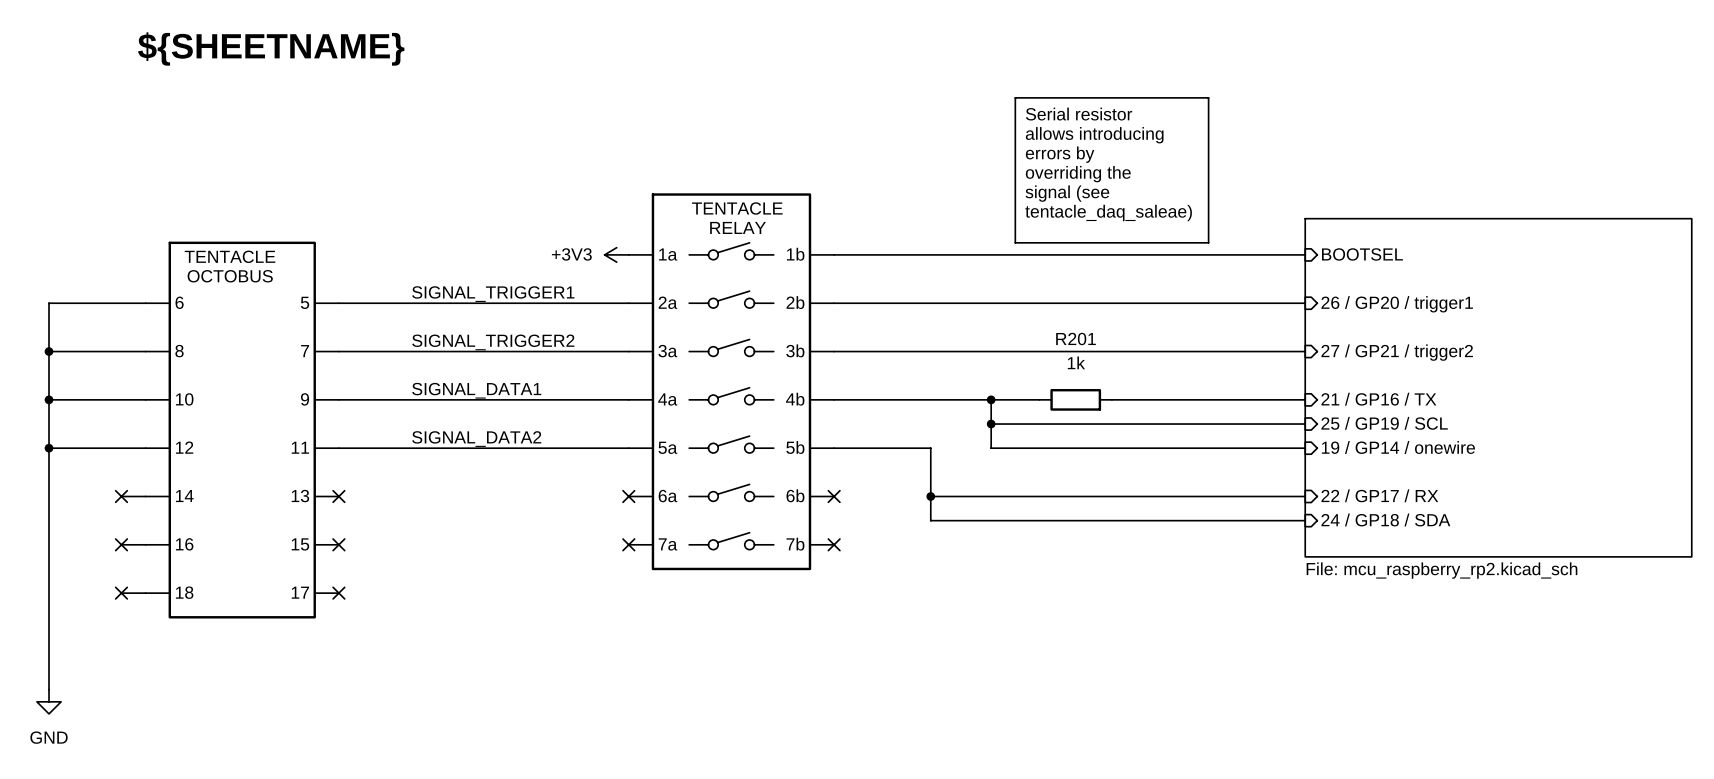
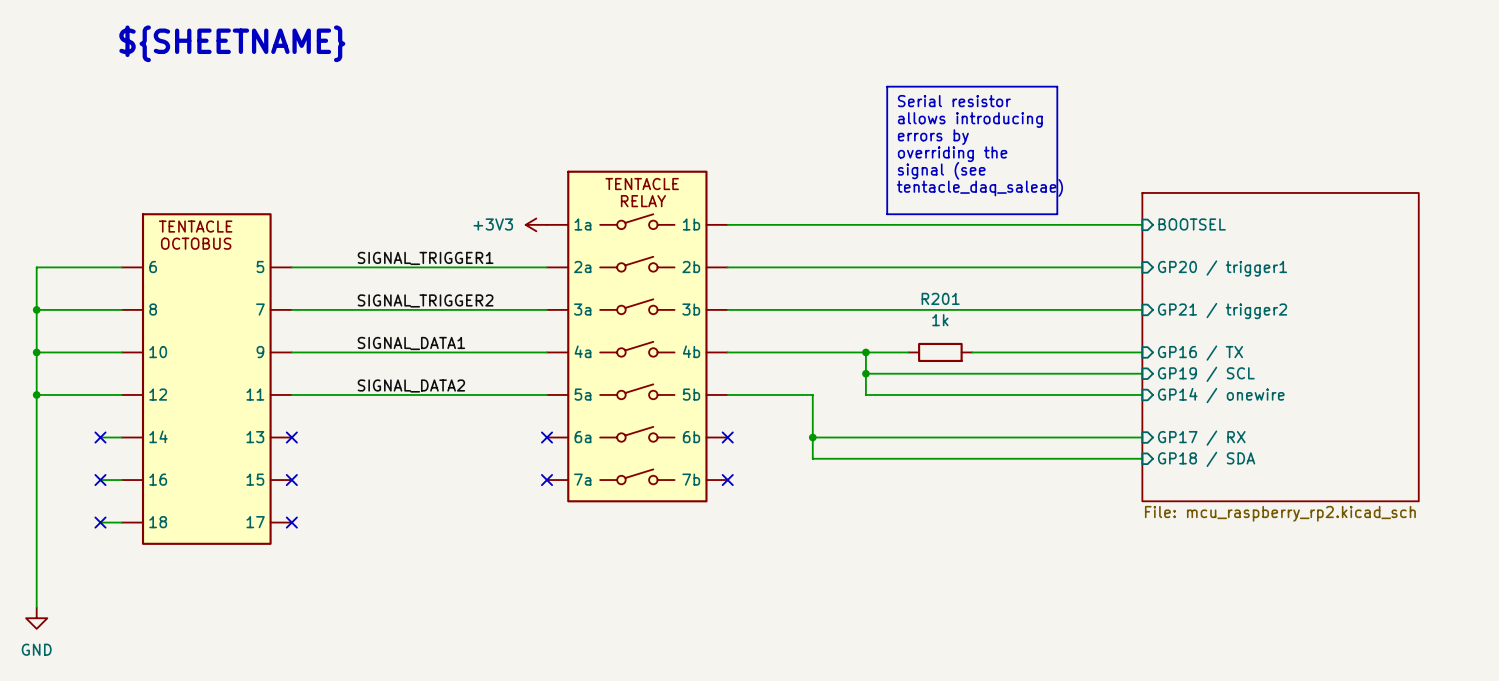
sheet pin: 26 / GP20 / trigger1 (1397, 304) -> GP20 / trigger1 (1222, 268)
sheet pin: 27 / GP21 / trigger2 (1397, 352) -> GP21 / trigger2 (1222, 311)
sheet: File: mcu_raspberry_rp2.kicad_sch (1498, 387) -> none
sheet: none -> File: mcu_raspberry_rp2.kicad_sch (1280, 347)
sheet pin: 21 / GP16 / TX (1378, 399) -> GP16 / TX (1200, 353)
sheet pin: 25 / GP19 / SCL (1384, 423) -> GP19 / SCL (1206, 374)
sheet pin: 19 / GP14 / onewire (1398, 447) -> GP14 / onewire (1221, 395)
sheet pin: 22 / GP17 / RX (1379, 495) -> GP17 / RX (1201, 438)
sheet pin: 24 / GP18 / SDA (1385, 519) -> GP18 / SDA (1206, 459)

